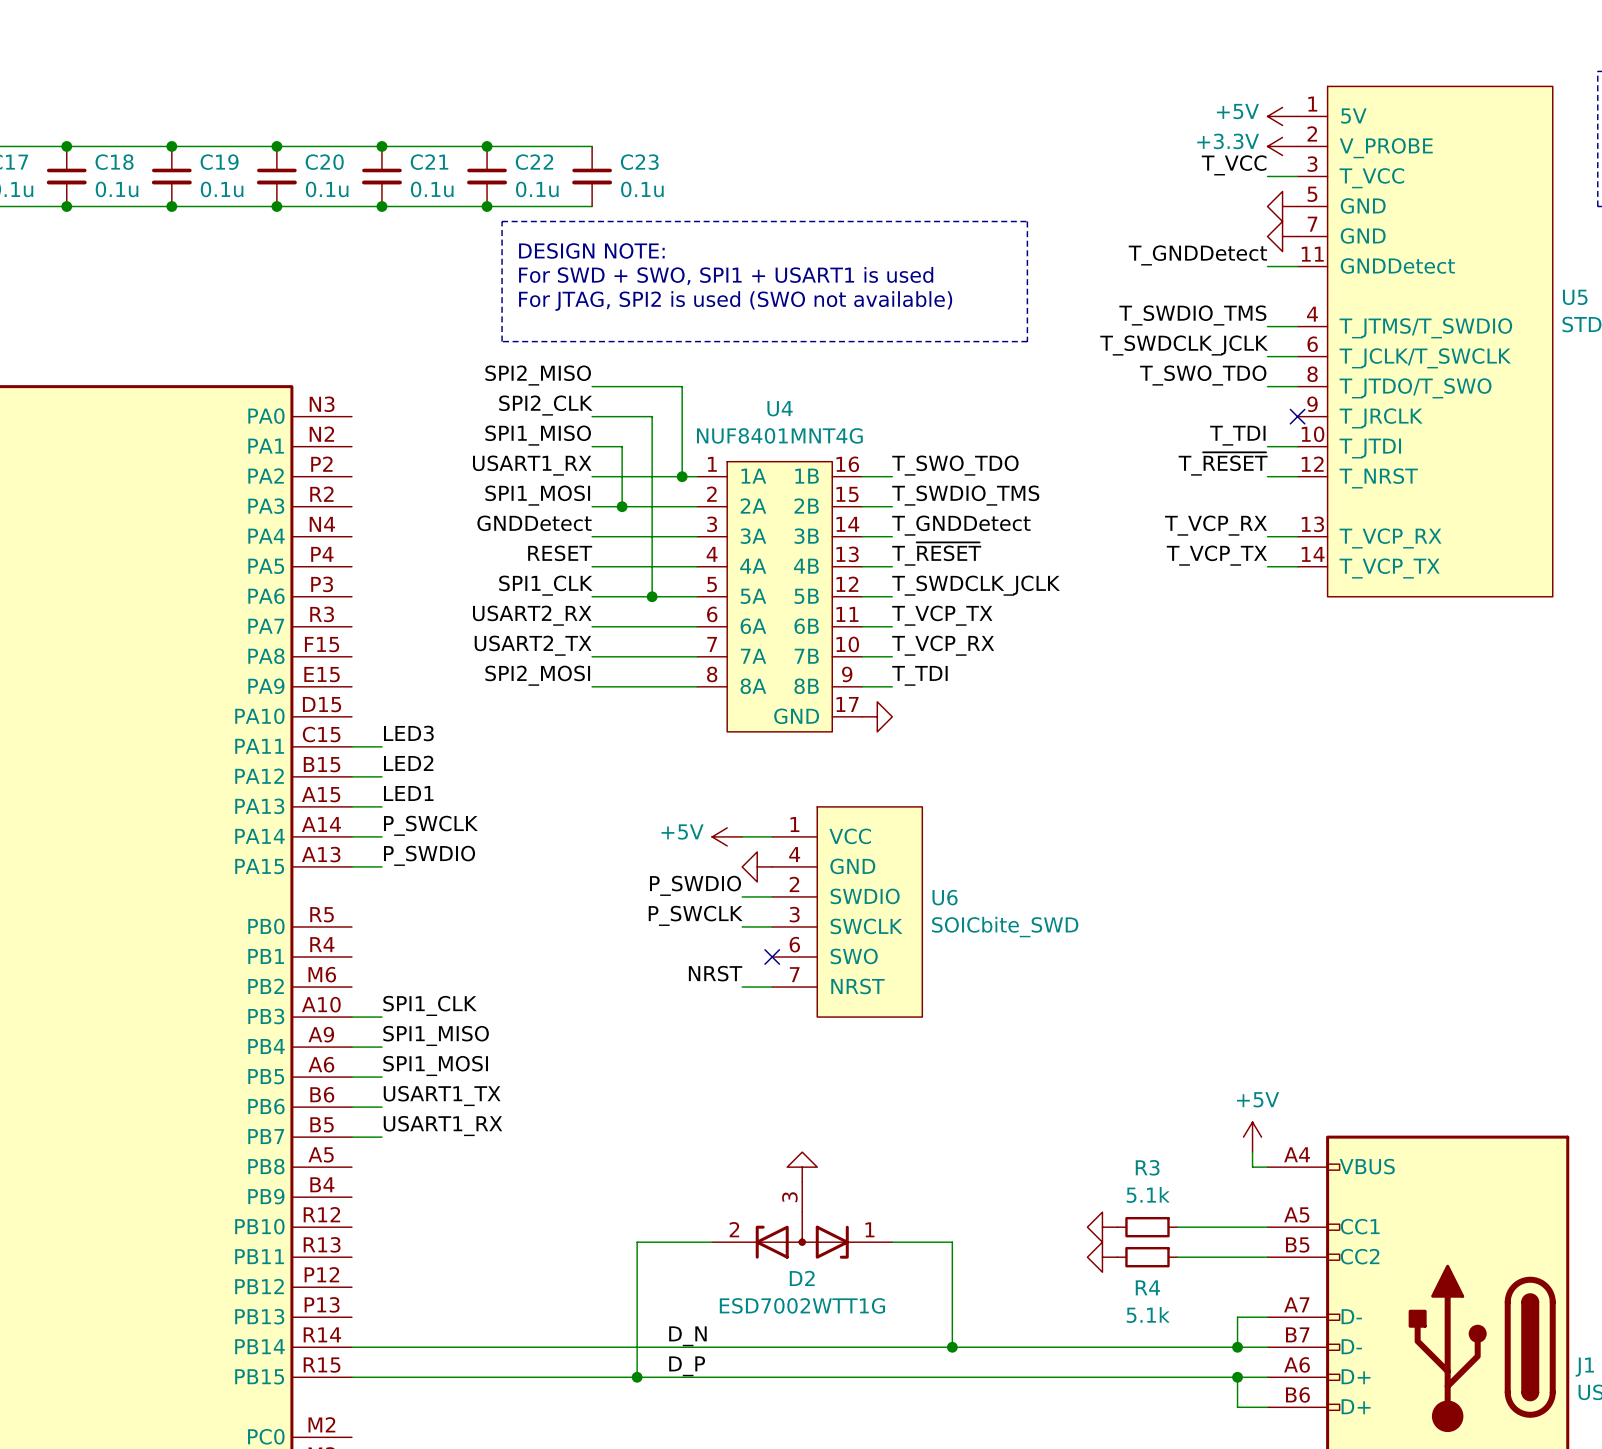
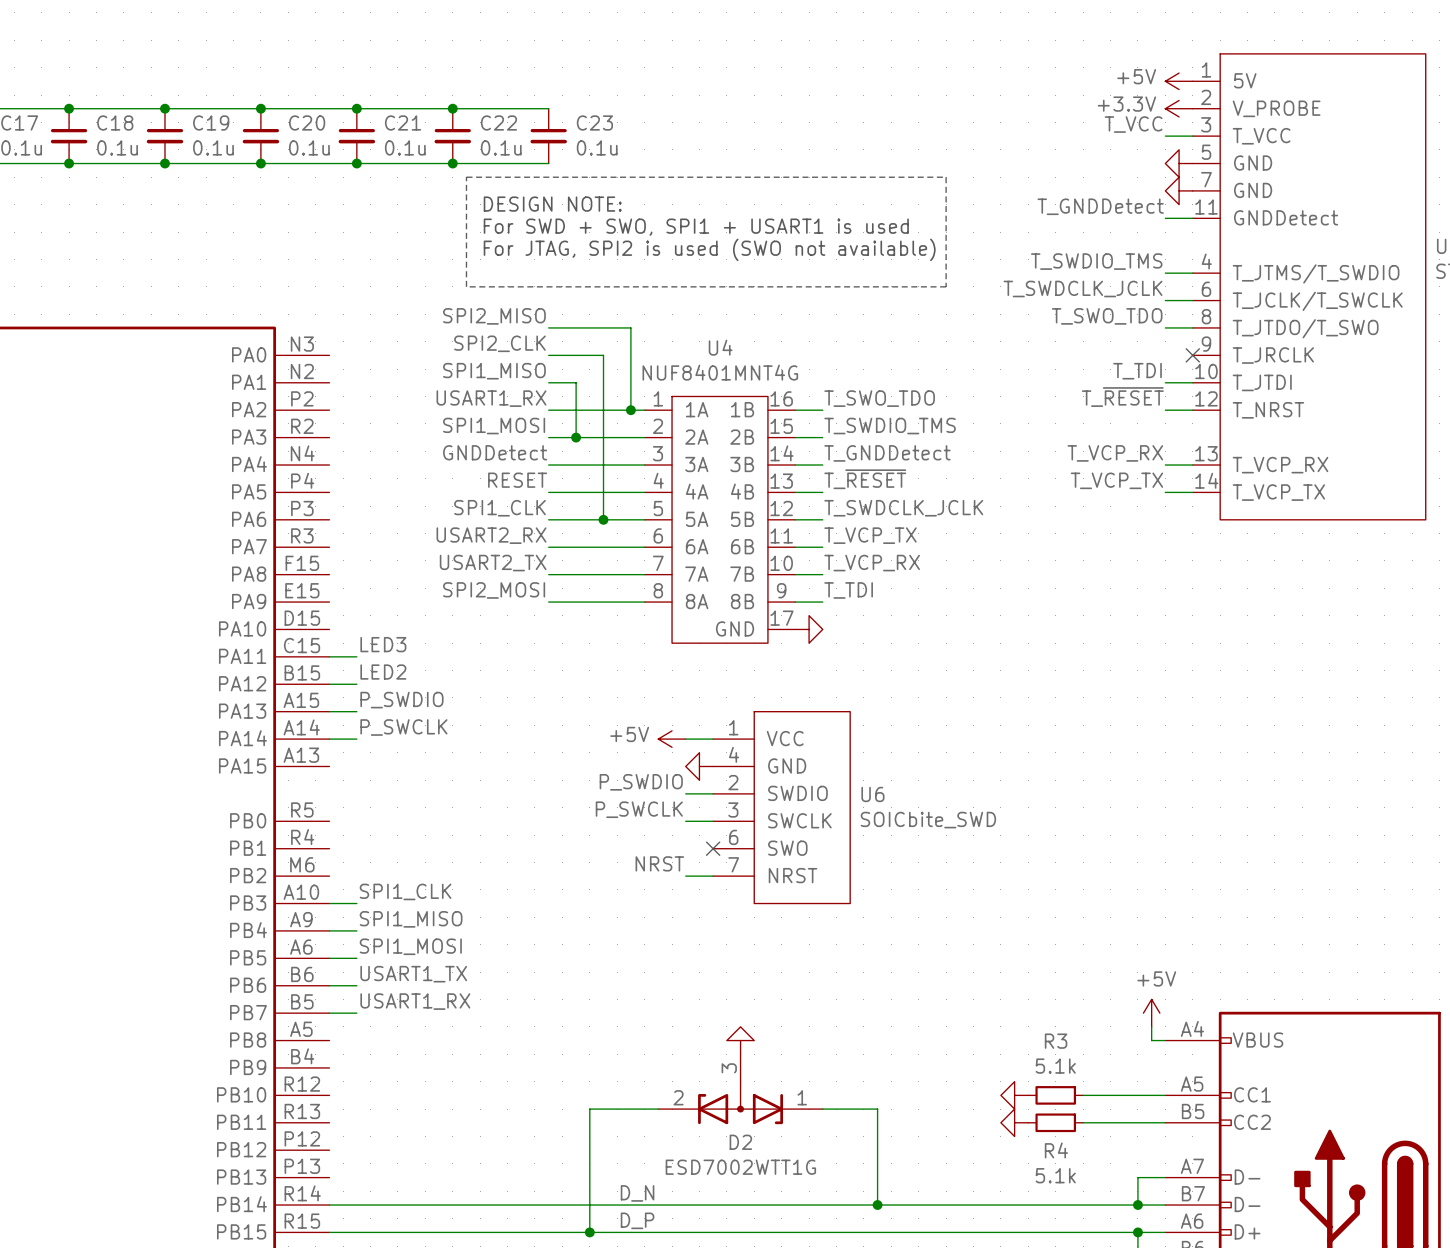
label: LED1 (408, 793) -> P_SWDIO (401, 700)
label: P_SWDIO (429, 855) -> none
wire: (351, 866) (381, 866) -> none

